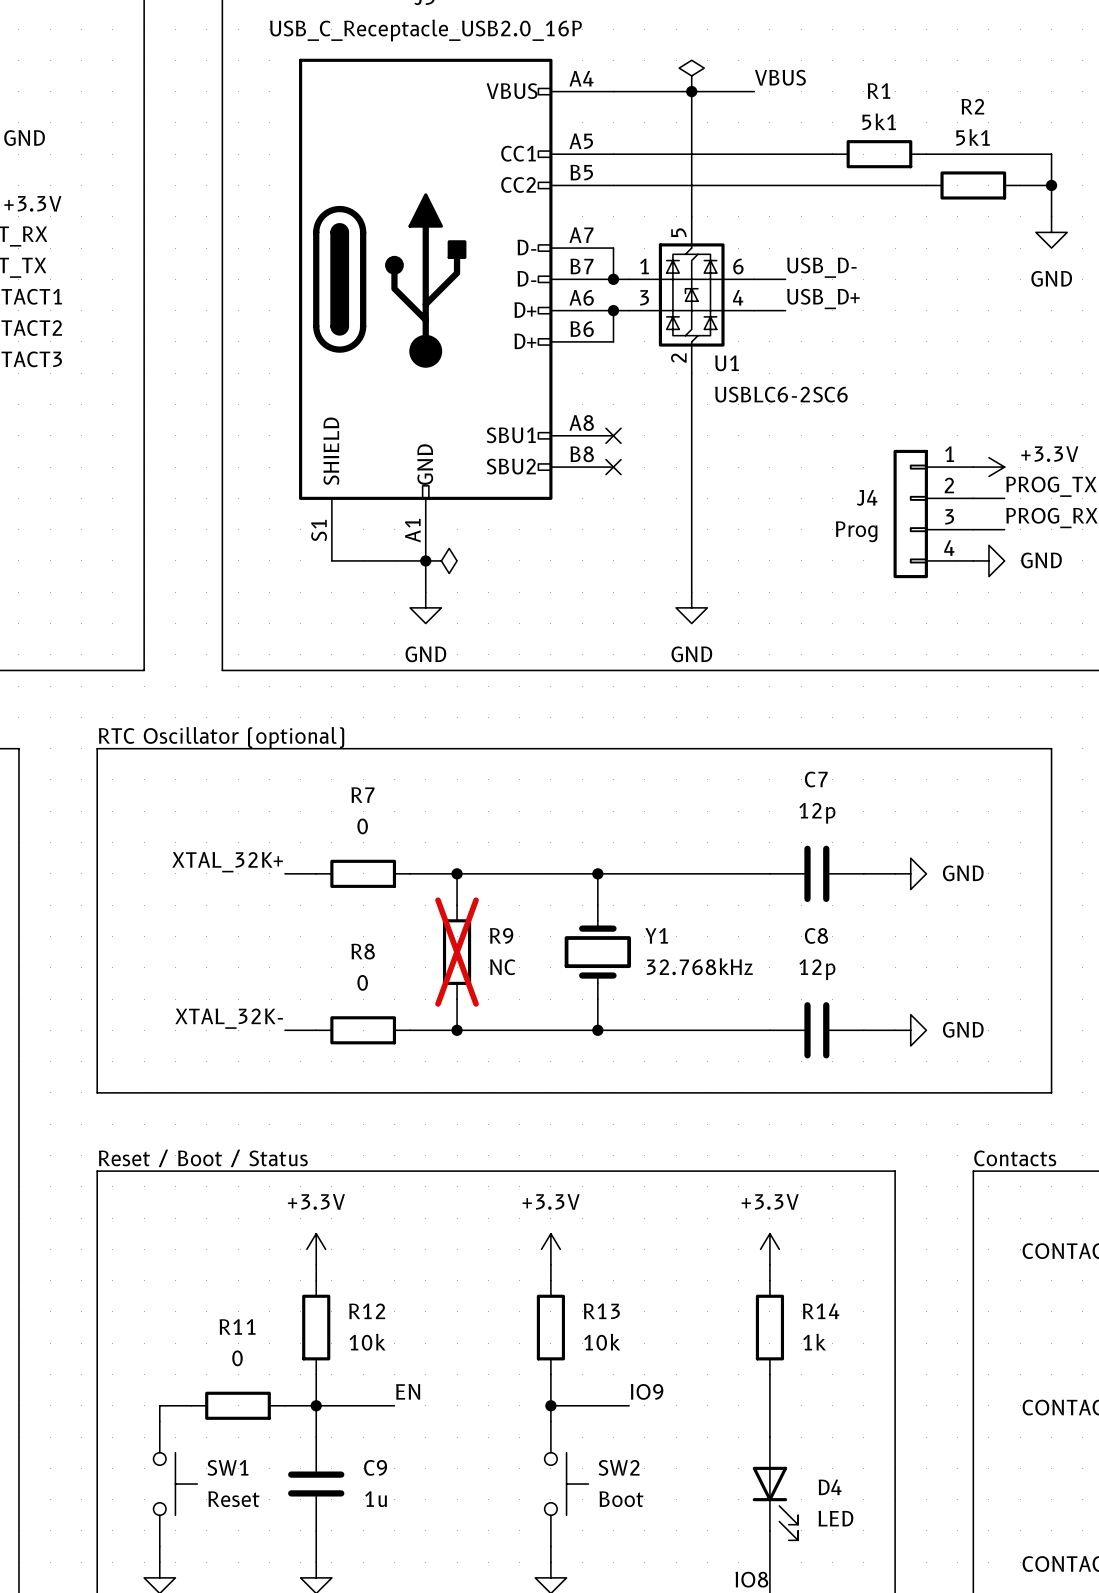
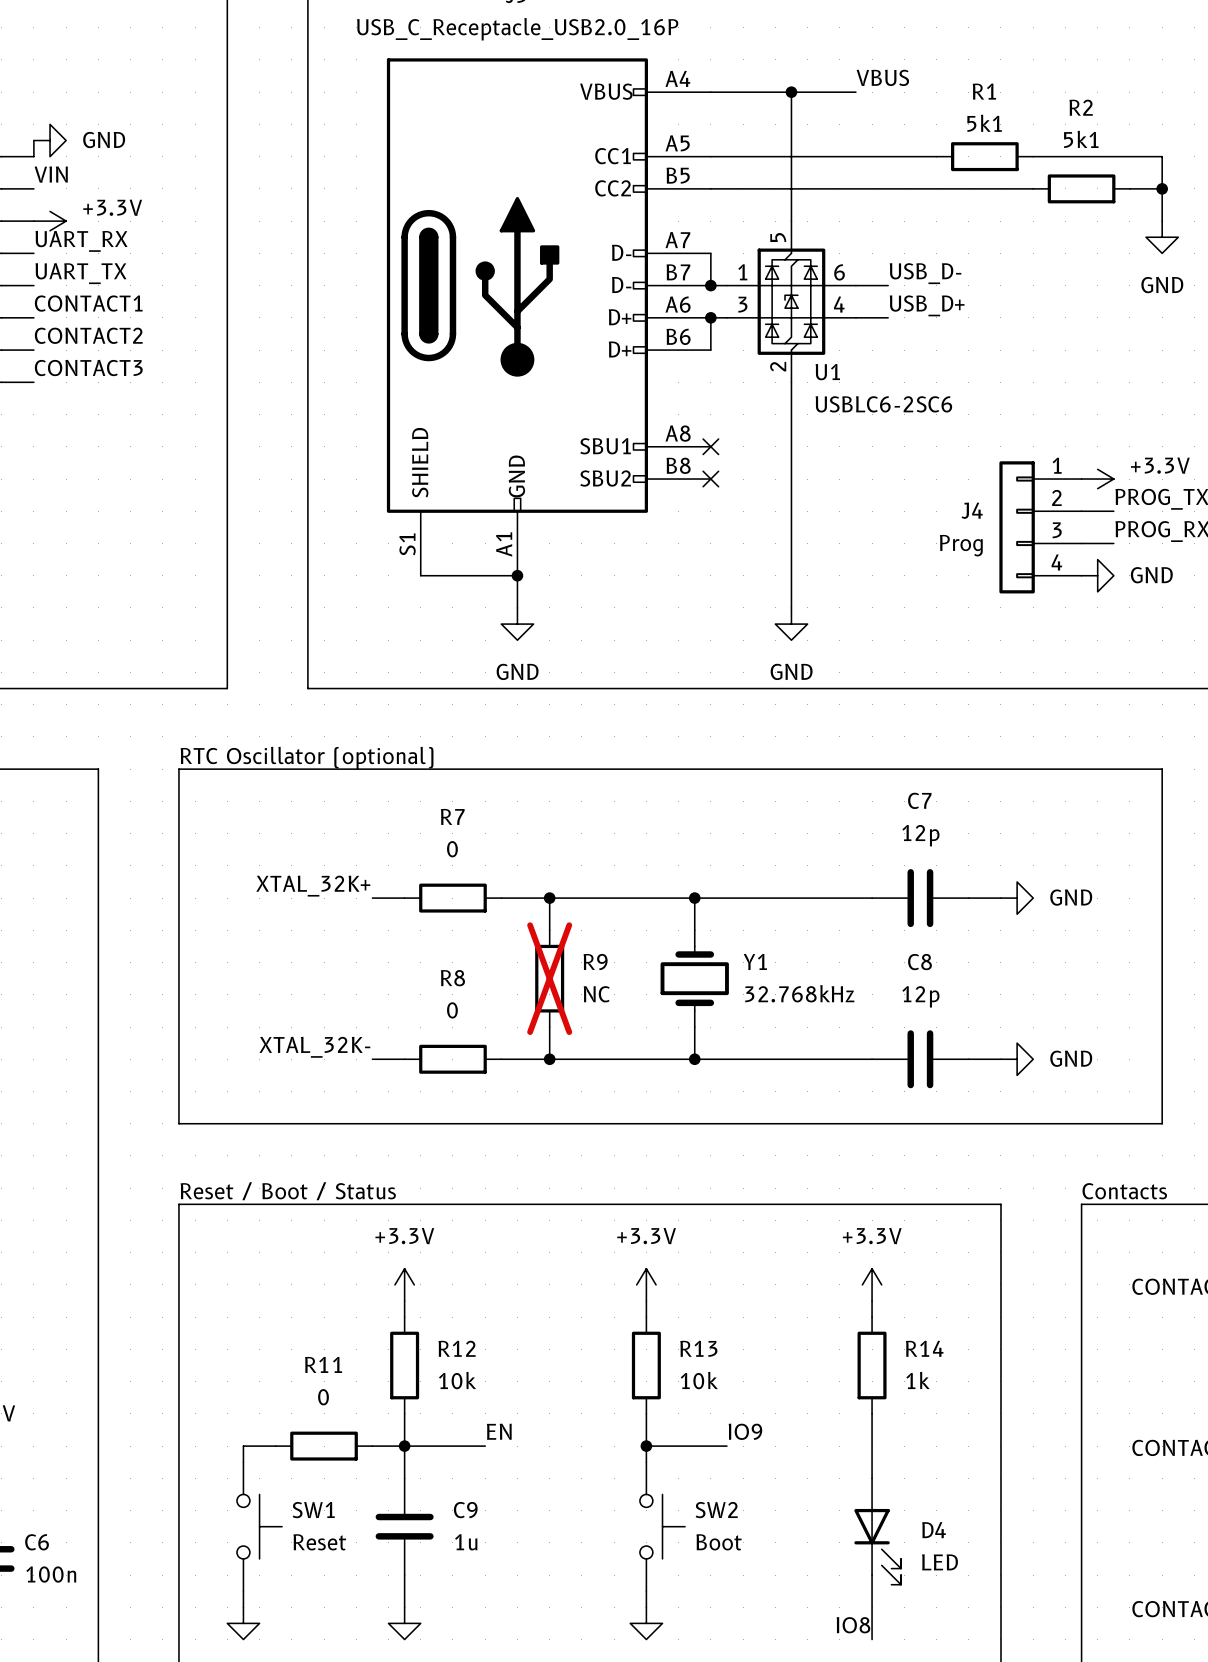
power symbol: (691, 75) -> none
power symbol: (441, 560) -> none

